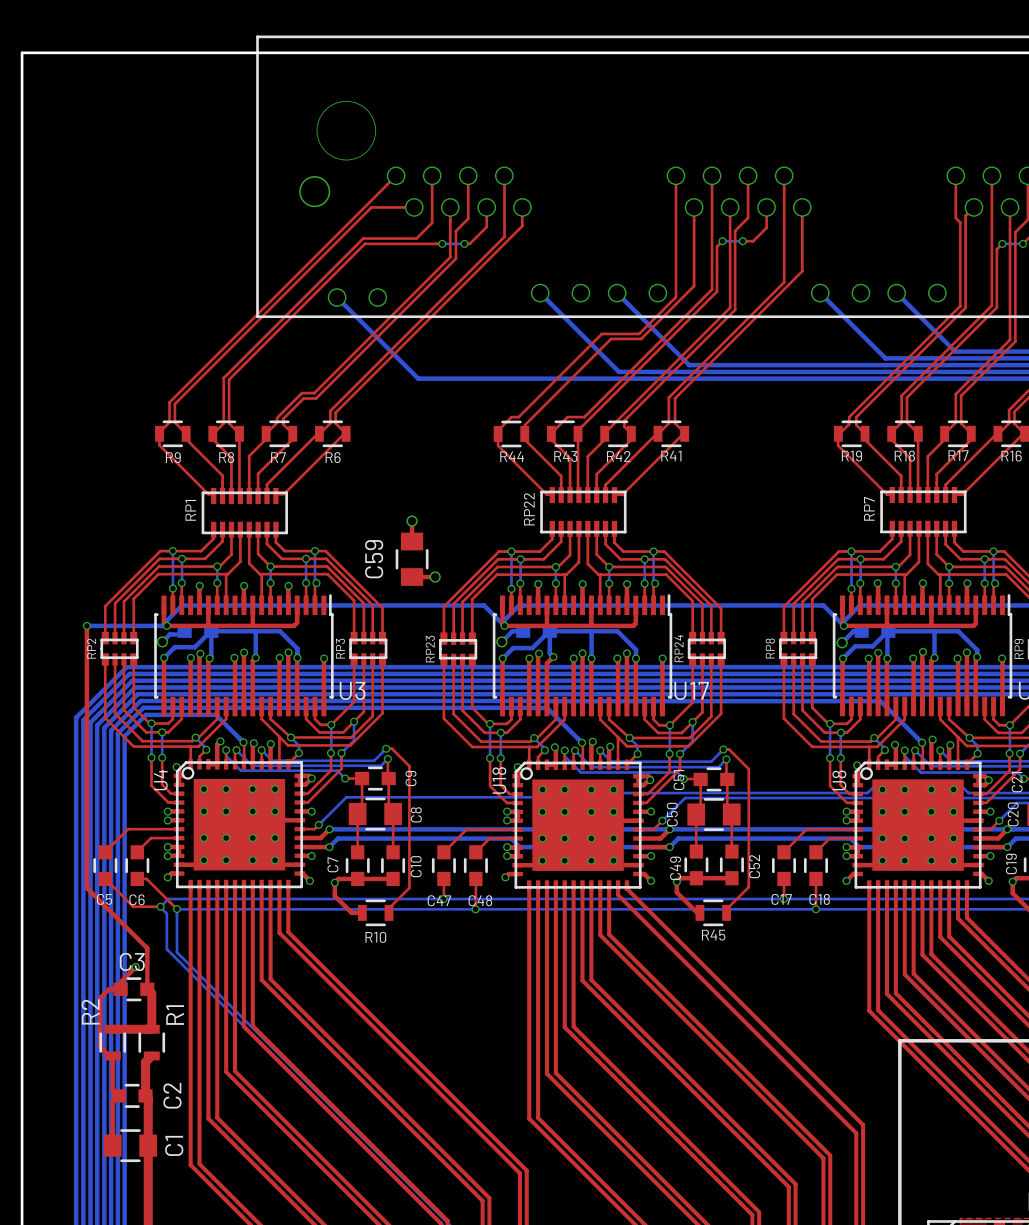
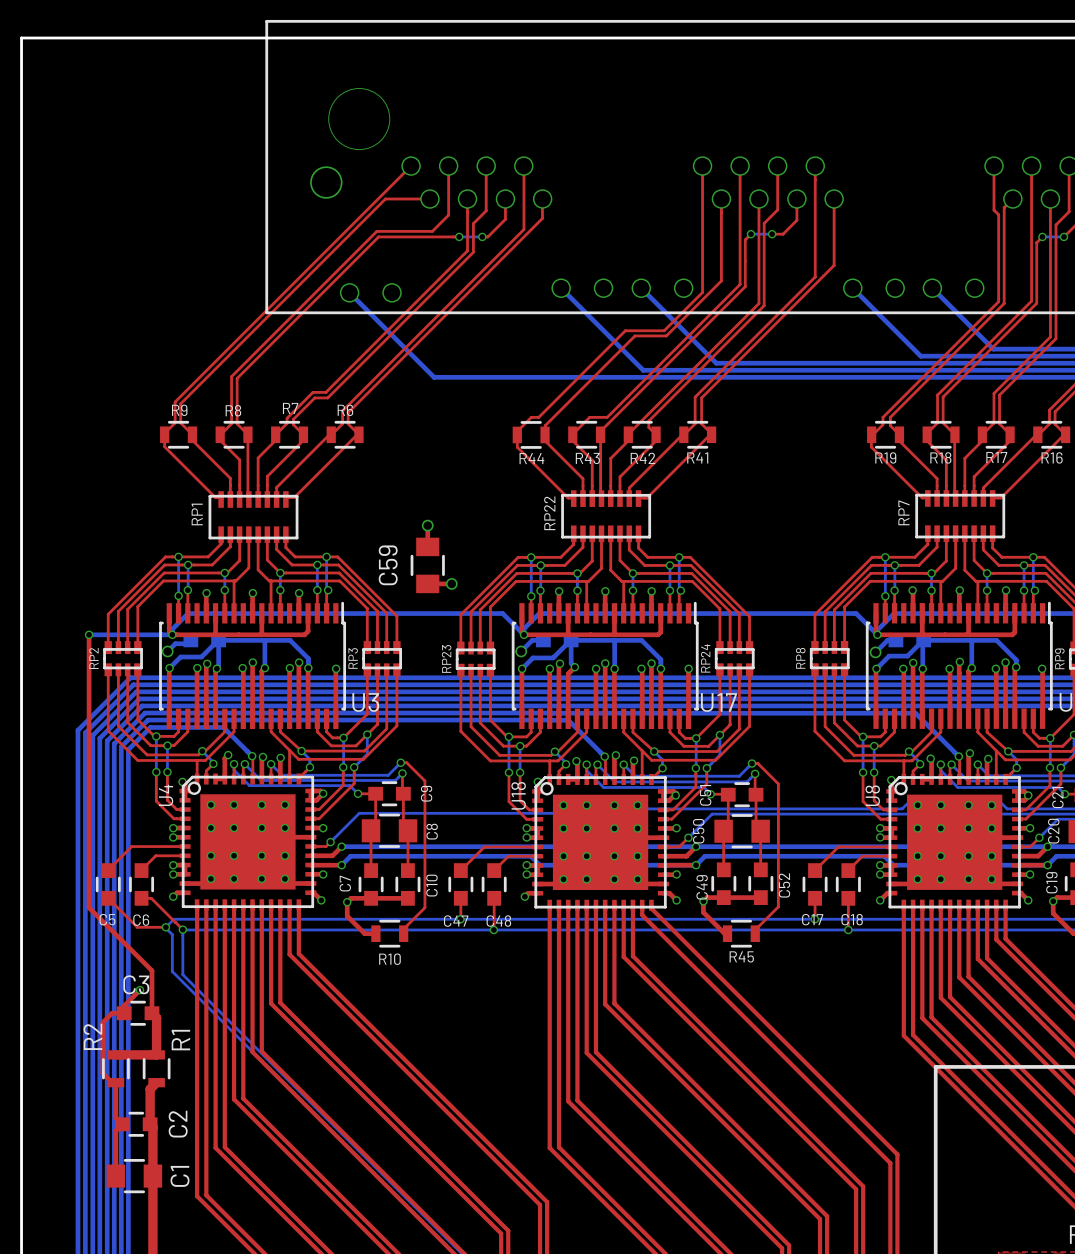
R9 name position: R9 (173, 457) -> R9 (179, 410)
R8 name position: R8 (226, 457) -> R8 (233, 410)
R7 name position: R7 (278, 457) -> R7 (290, 408)
R6 name position: R6 (333, 457) -> R6 (345, 410)

